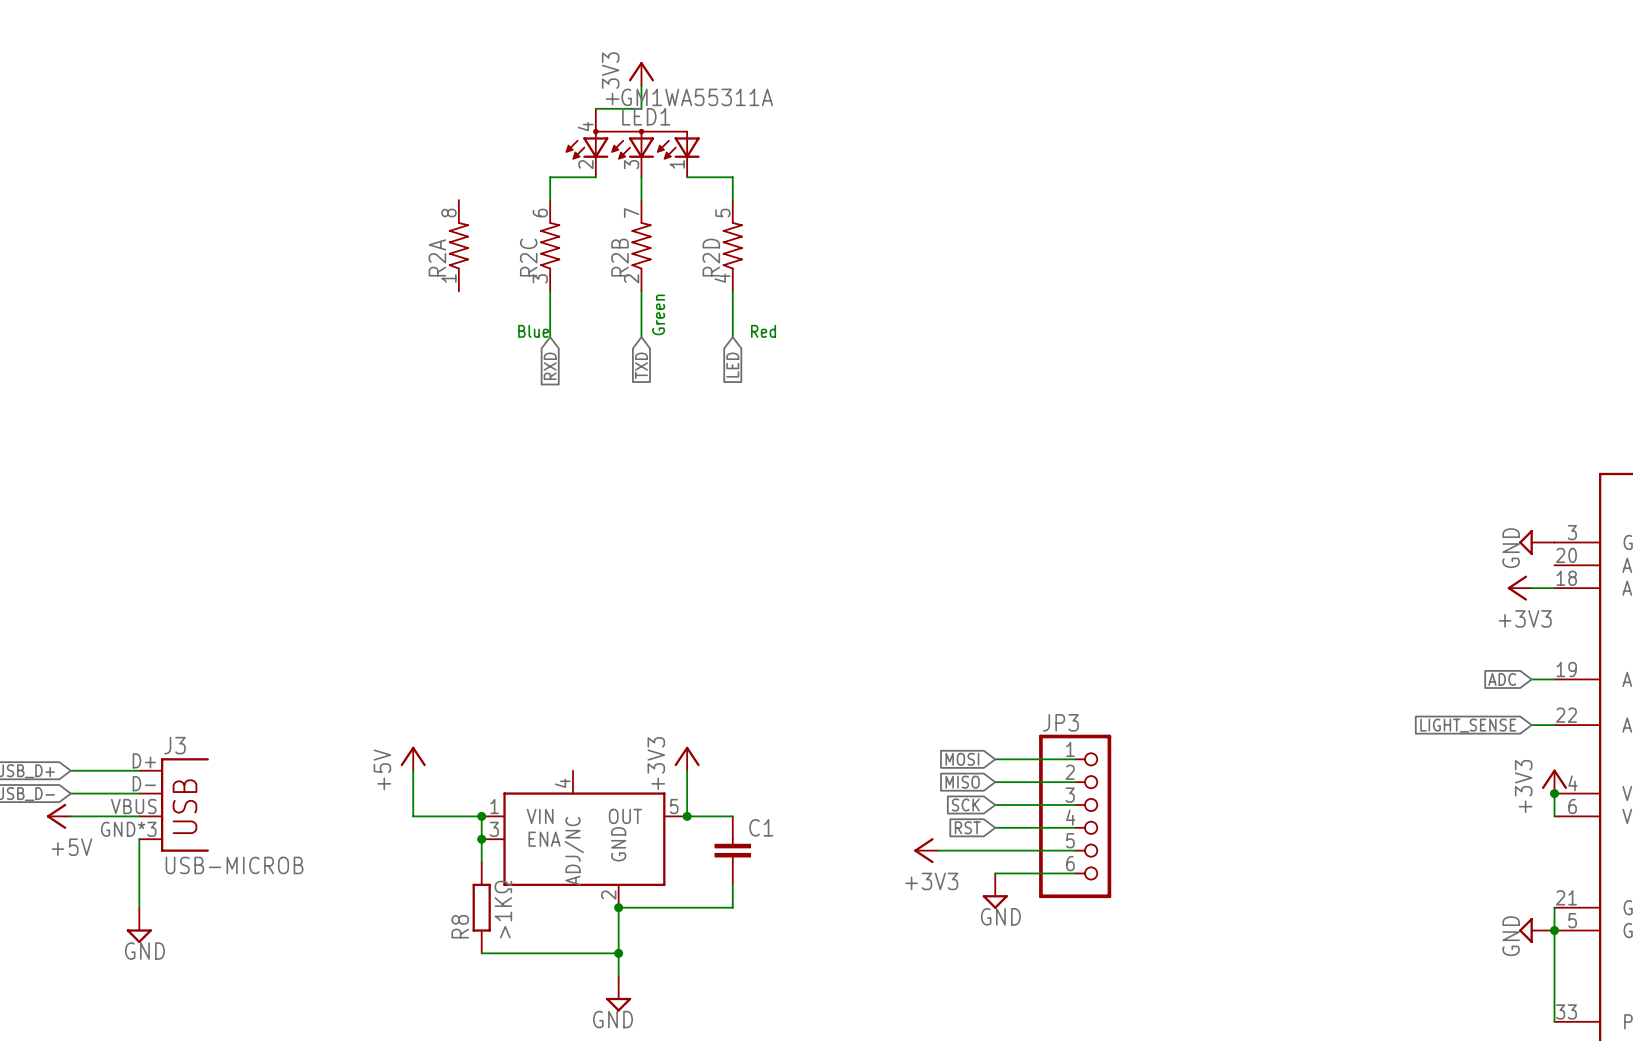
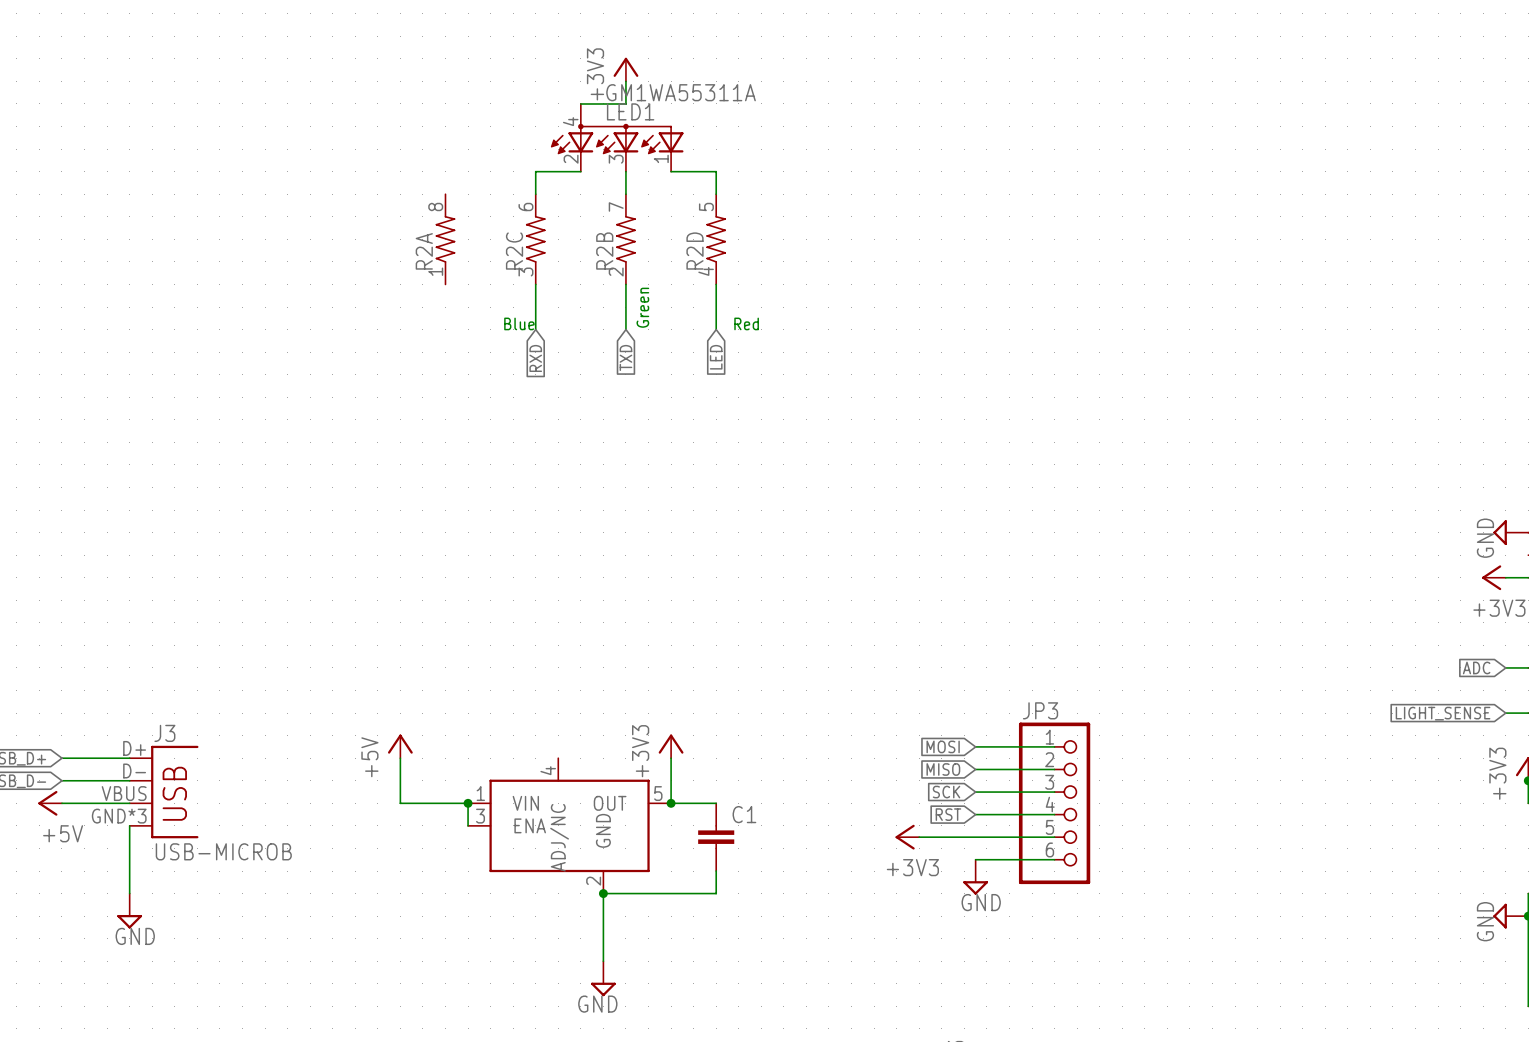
wire: (481, 839) (481, 862) -> none
junction: (481, 839) -> none
R8: >1KΩ (481, 907) -> none
wire: (481, 953) (618, 953) -> none
junction: (618, 953) -> none

